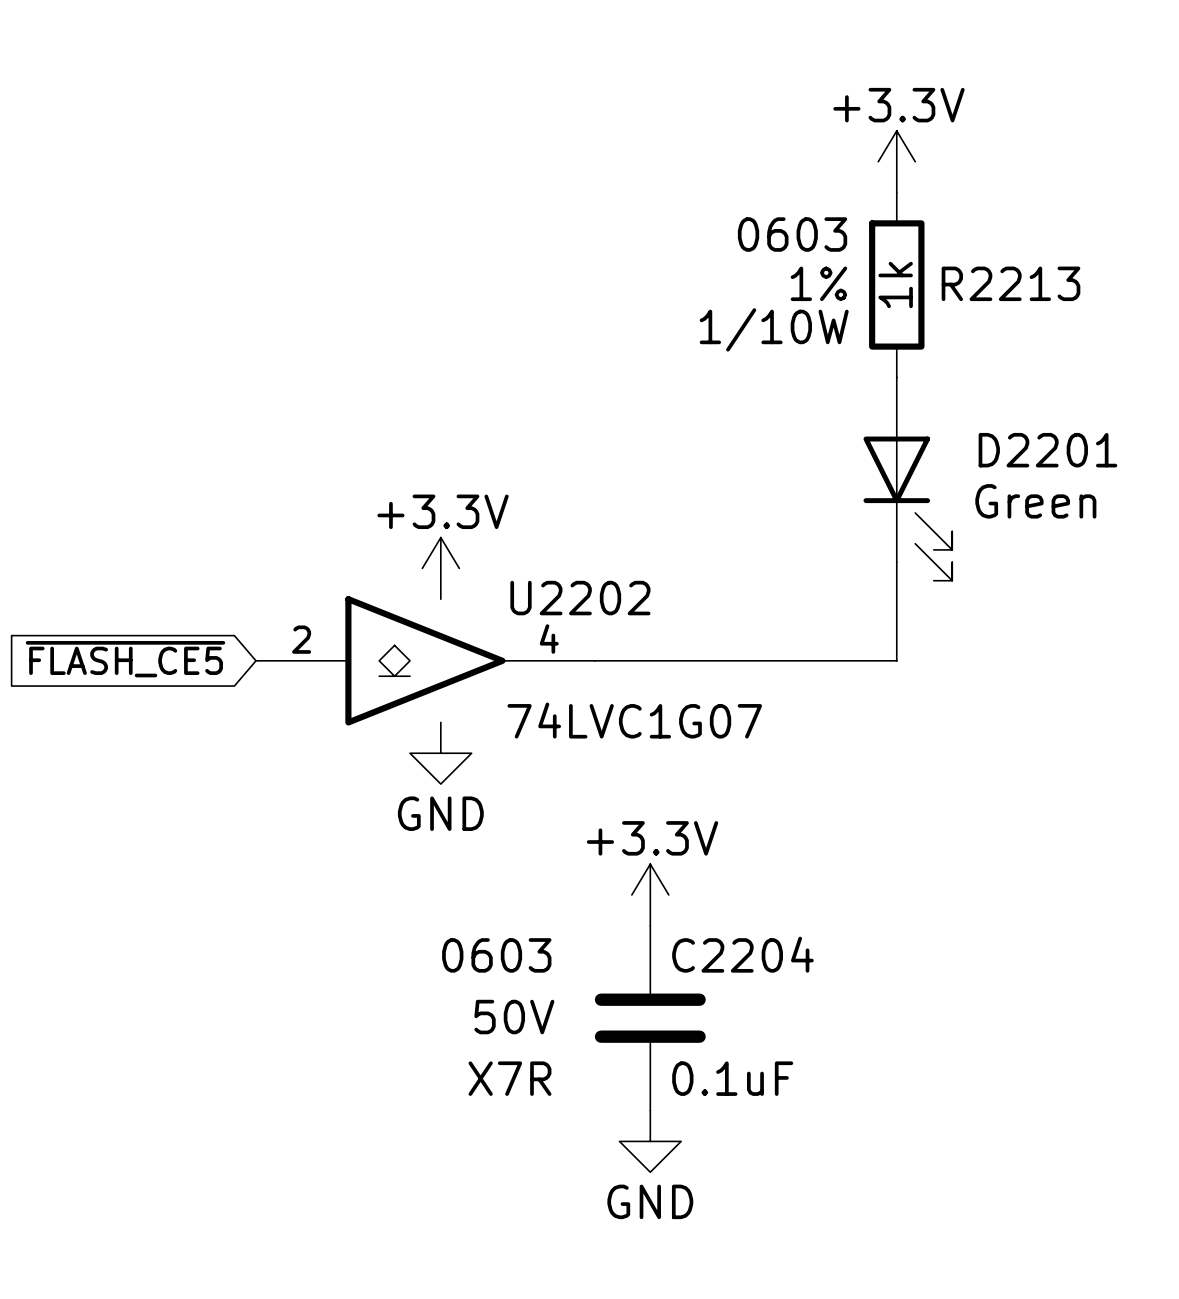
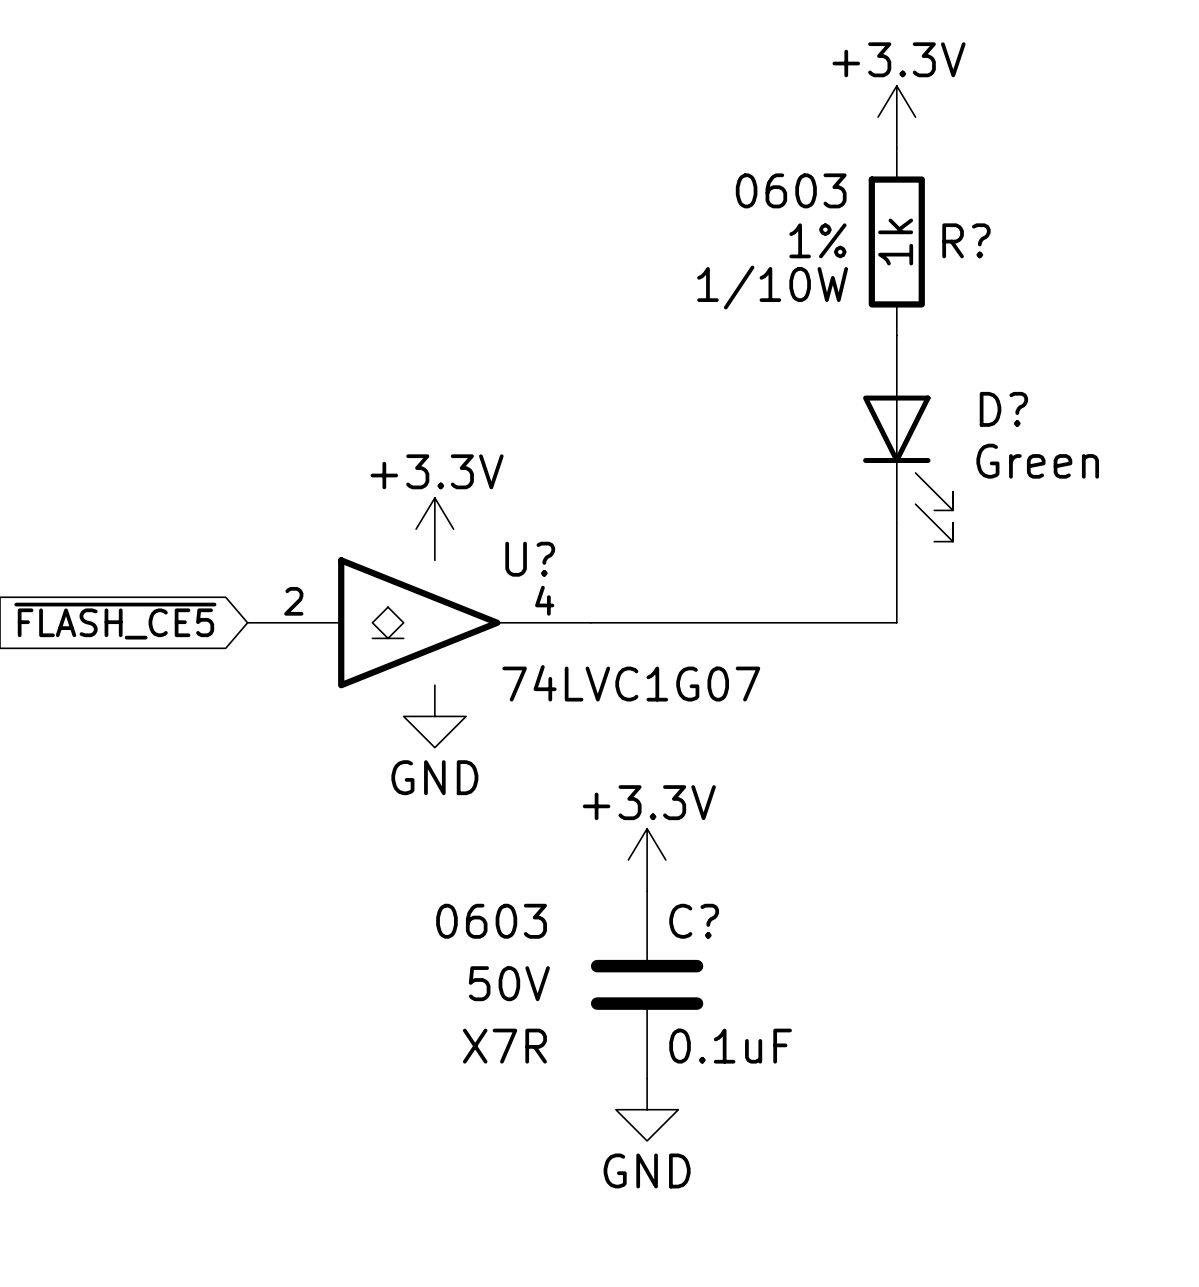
R2213 name: R2213 (1010, 283) -> R? (966, 240)
D2201 name: D2201 (1047, 450) -> D? (1003, 409)
U2202 name: U2202 (580, 598) -> U? (530, 559)
C2204 name: C2204 (742, 954) -> C? (694, 921)

